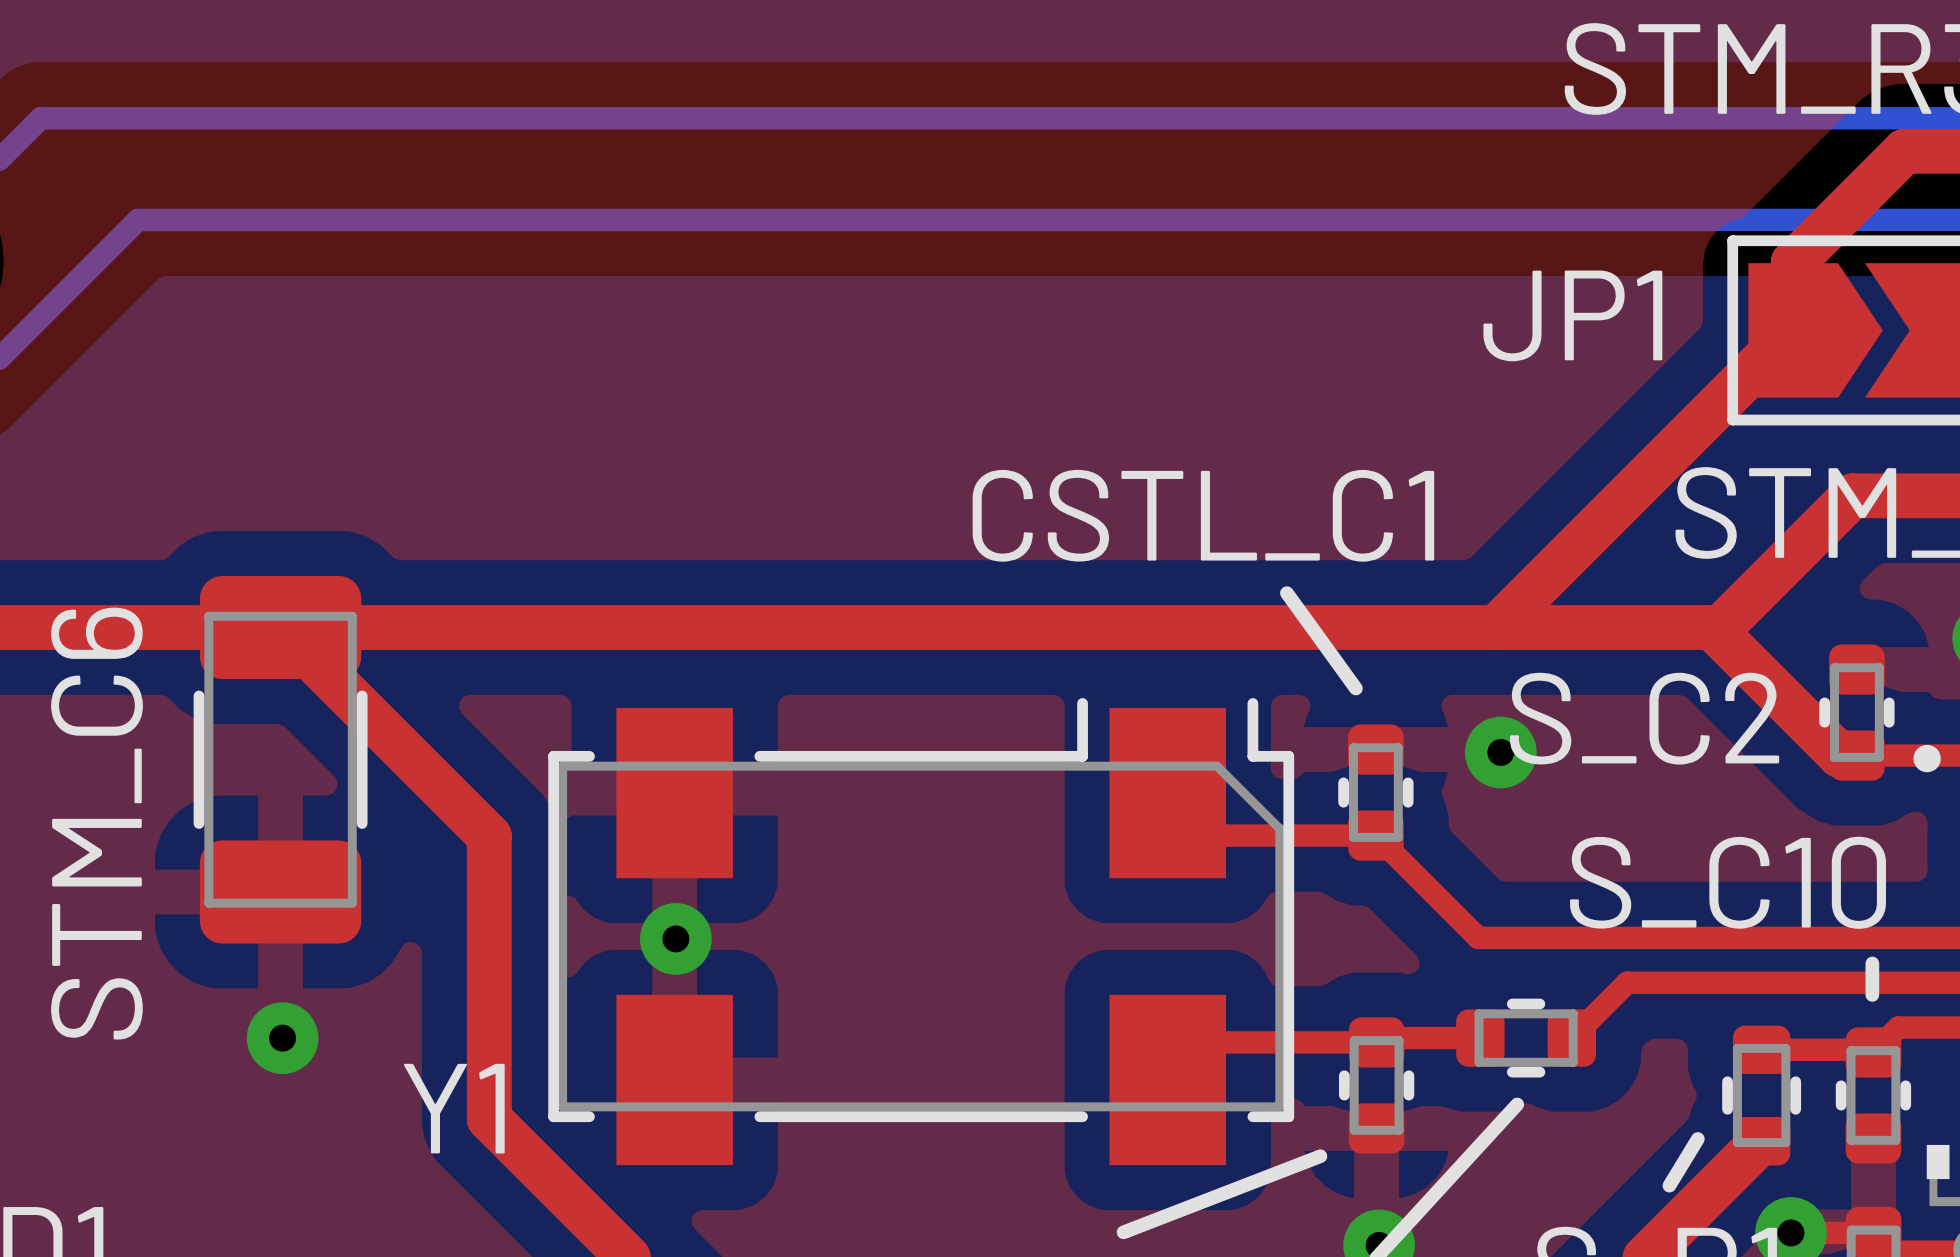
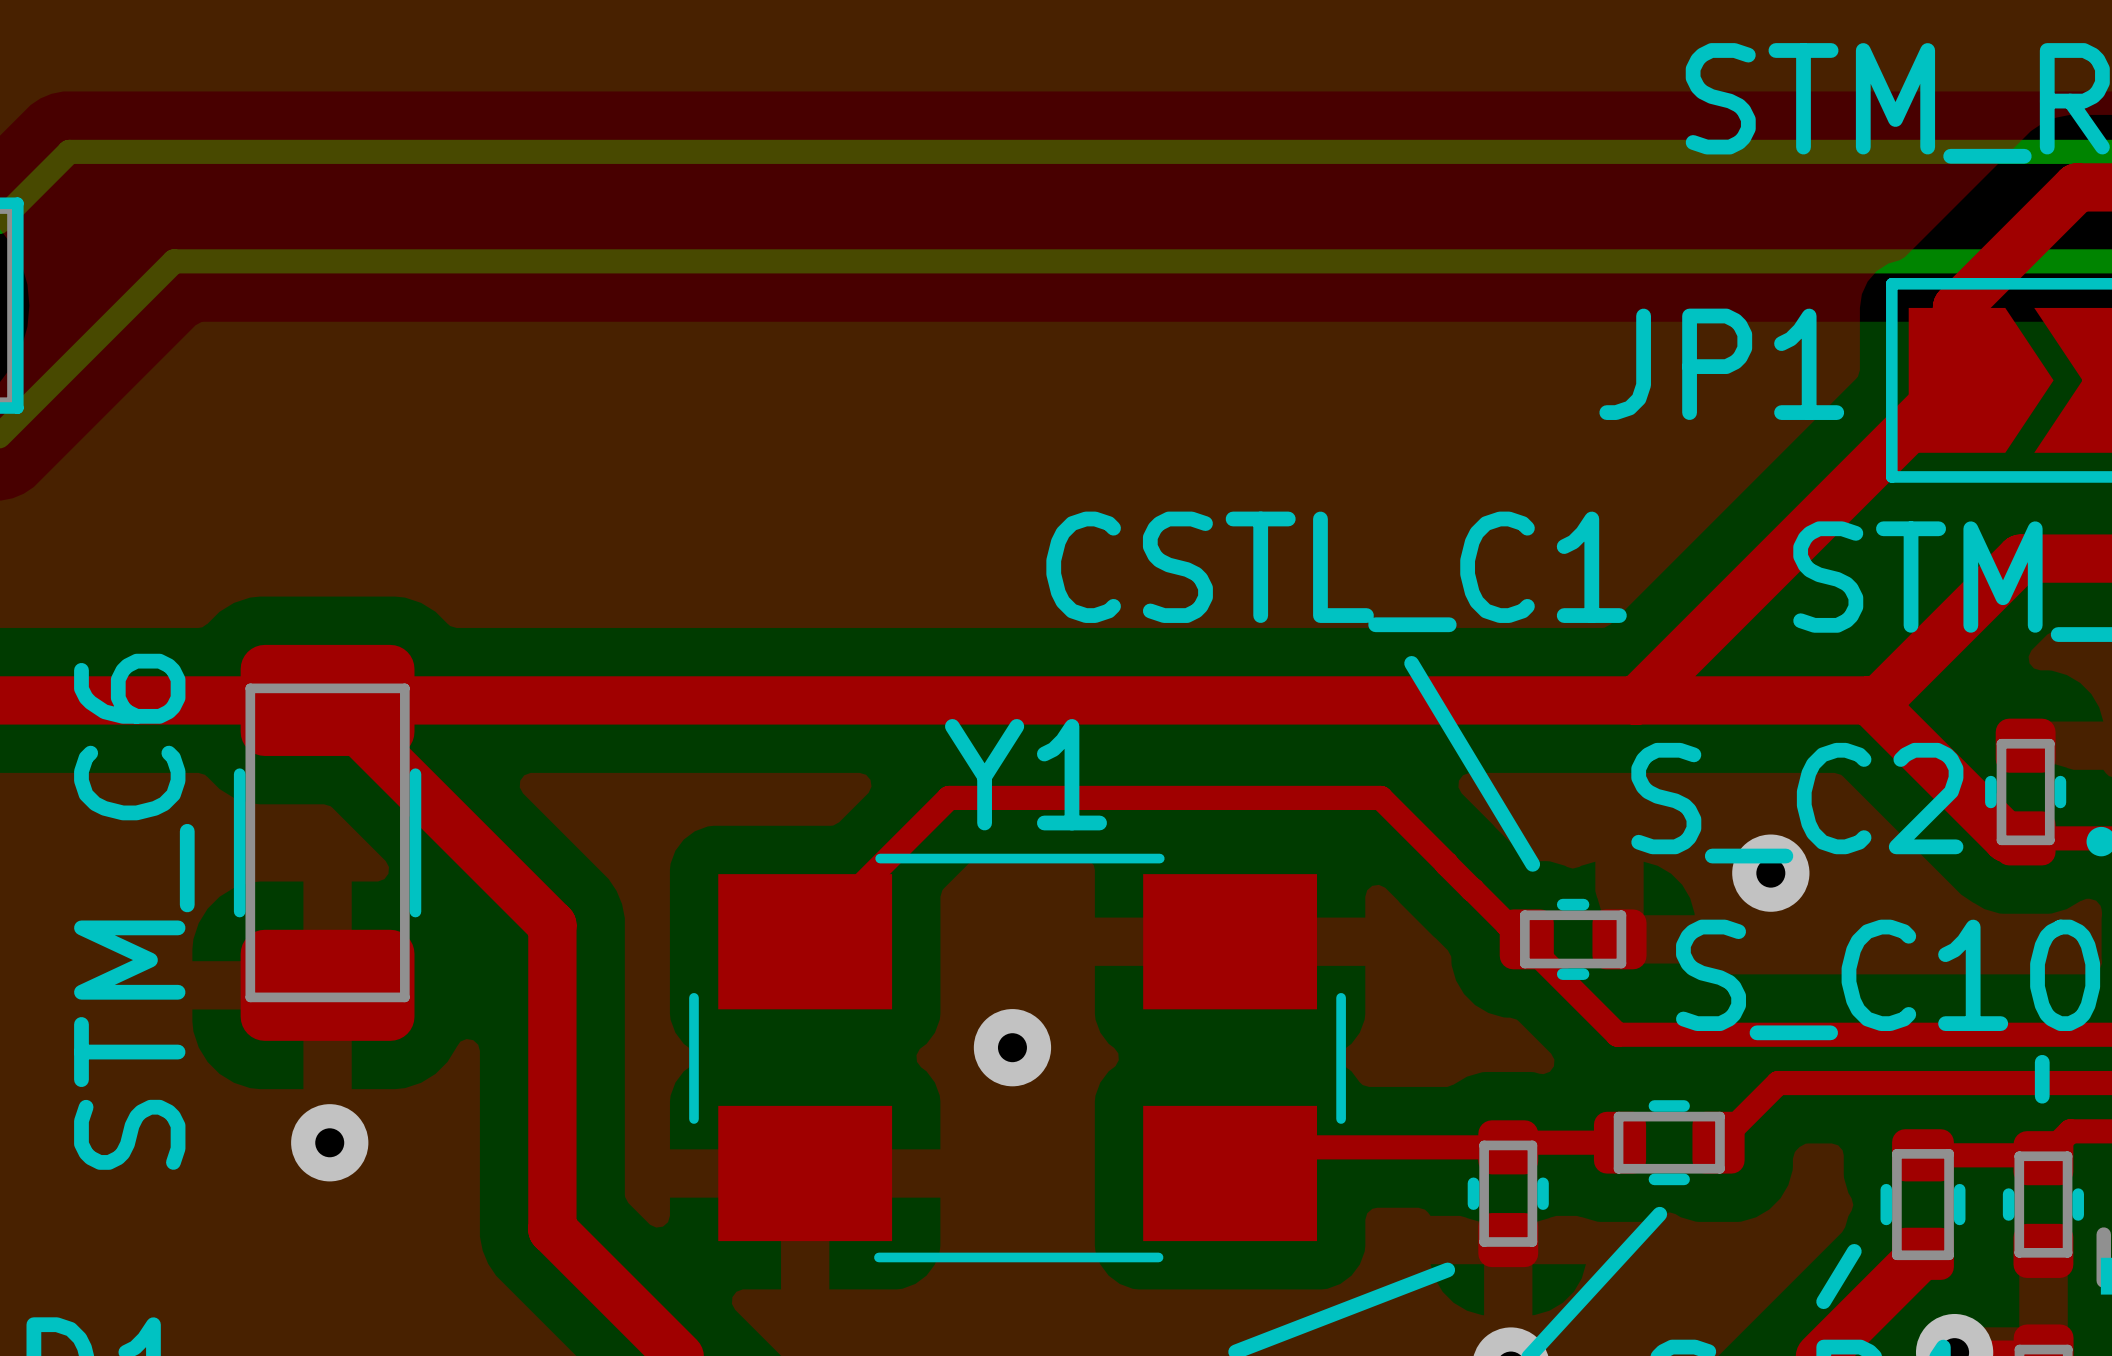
line: (1286, 593) (1355, 688) -> (1411, 663) (1532, 864)
Y1 footprint: [548, 698, 1295, 1166] -> [689, 853, 1346, 1263]
via position: (1500, 752) -> (1770, 873)
CSTL_C1 rotation: 0° (1375, 792) -> 90° clockwise (1573, 939)
CSTL_C1 position: (1375, 792) -> (1573, 939)
top track: (1167, 793) (1210, 835) (1375, 835) -> (805, 941) (948, 797) (1380, 797) (1507, 924)
via position: (675, 938) -> (1012, 1047)
Y1 name position: Y1 (454, 1108) -> Y1 (1025, 774)

